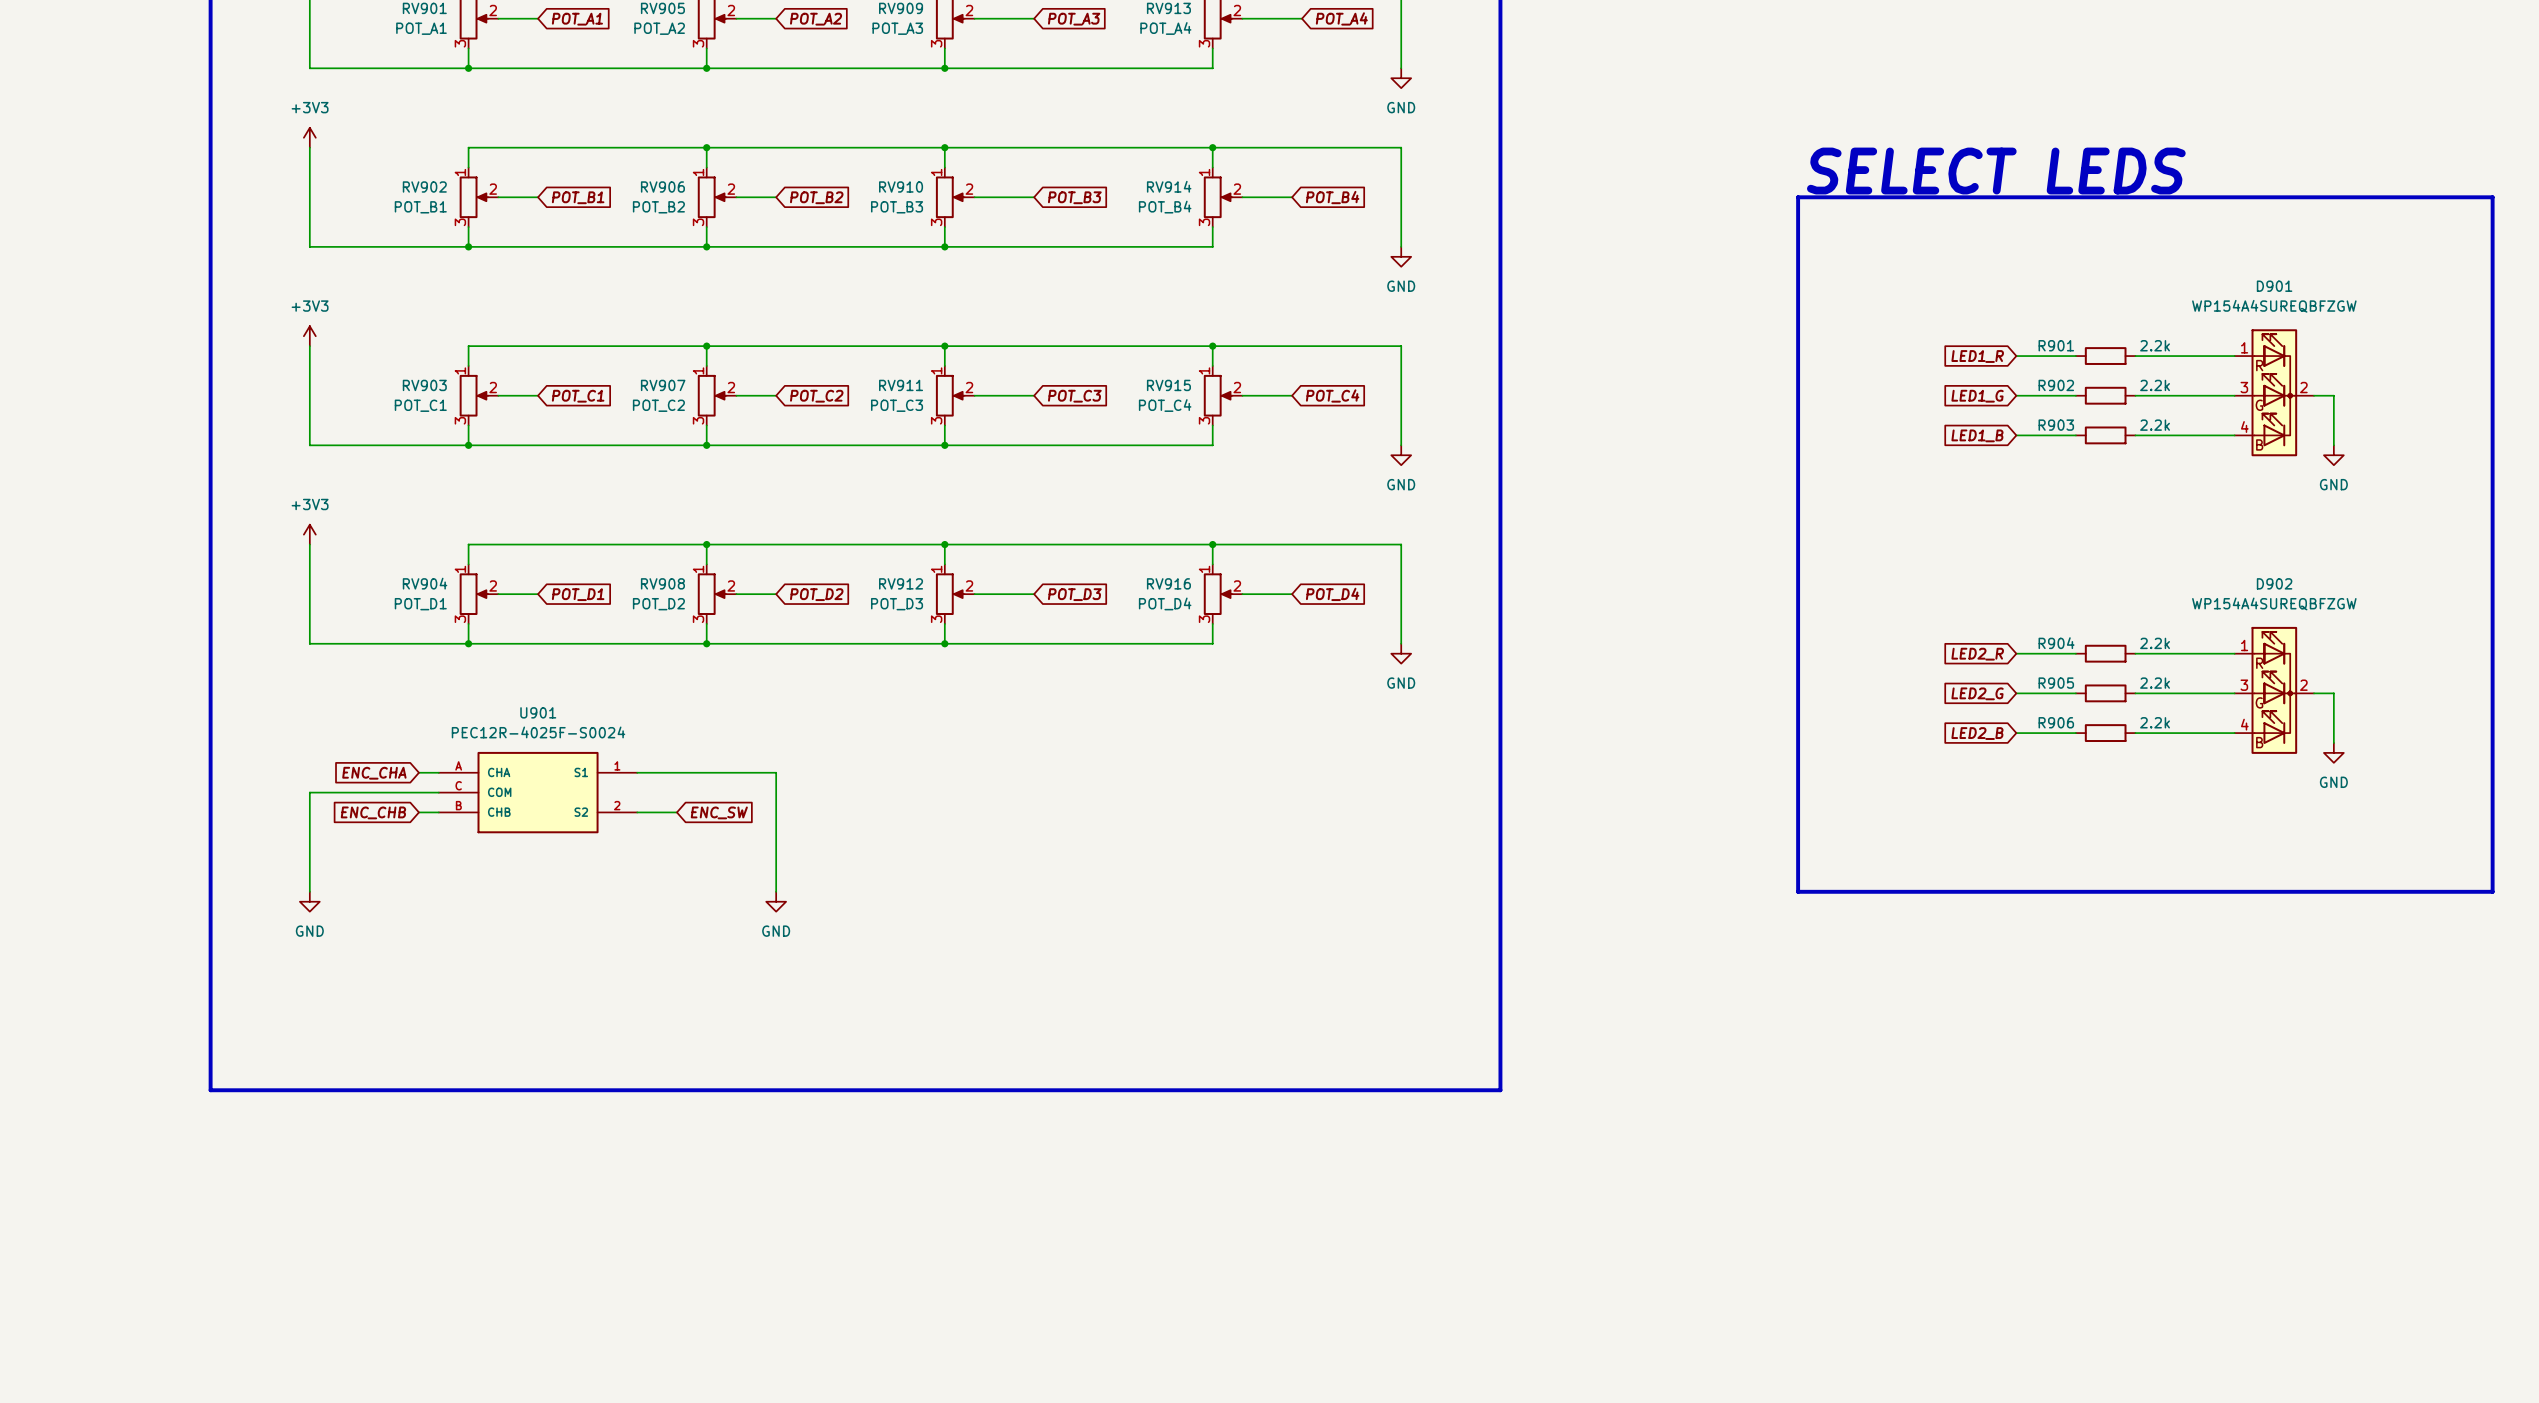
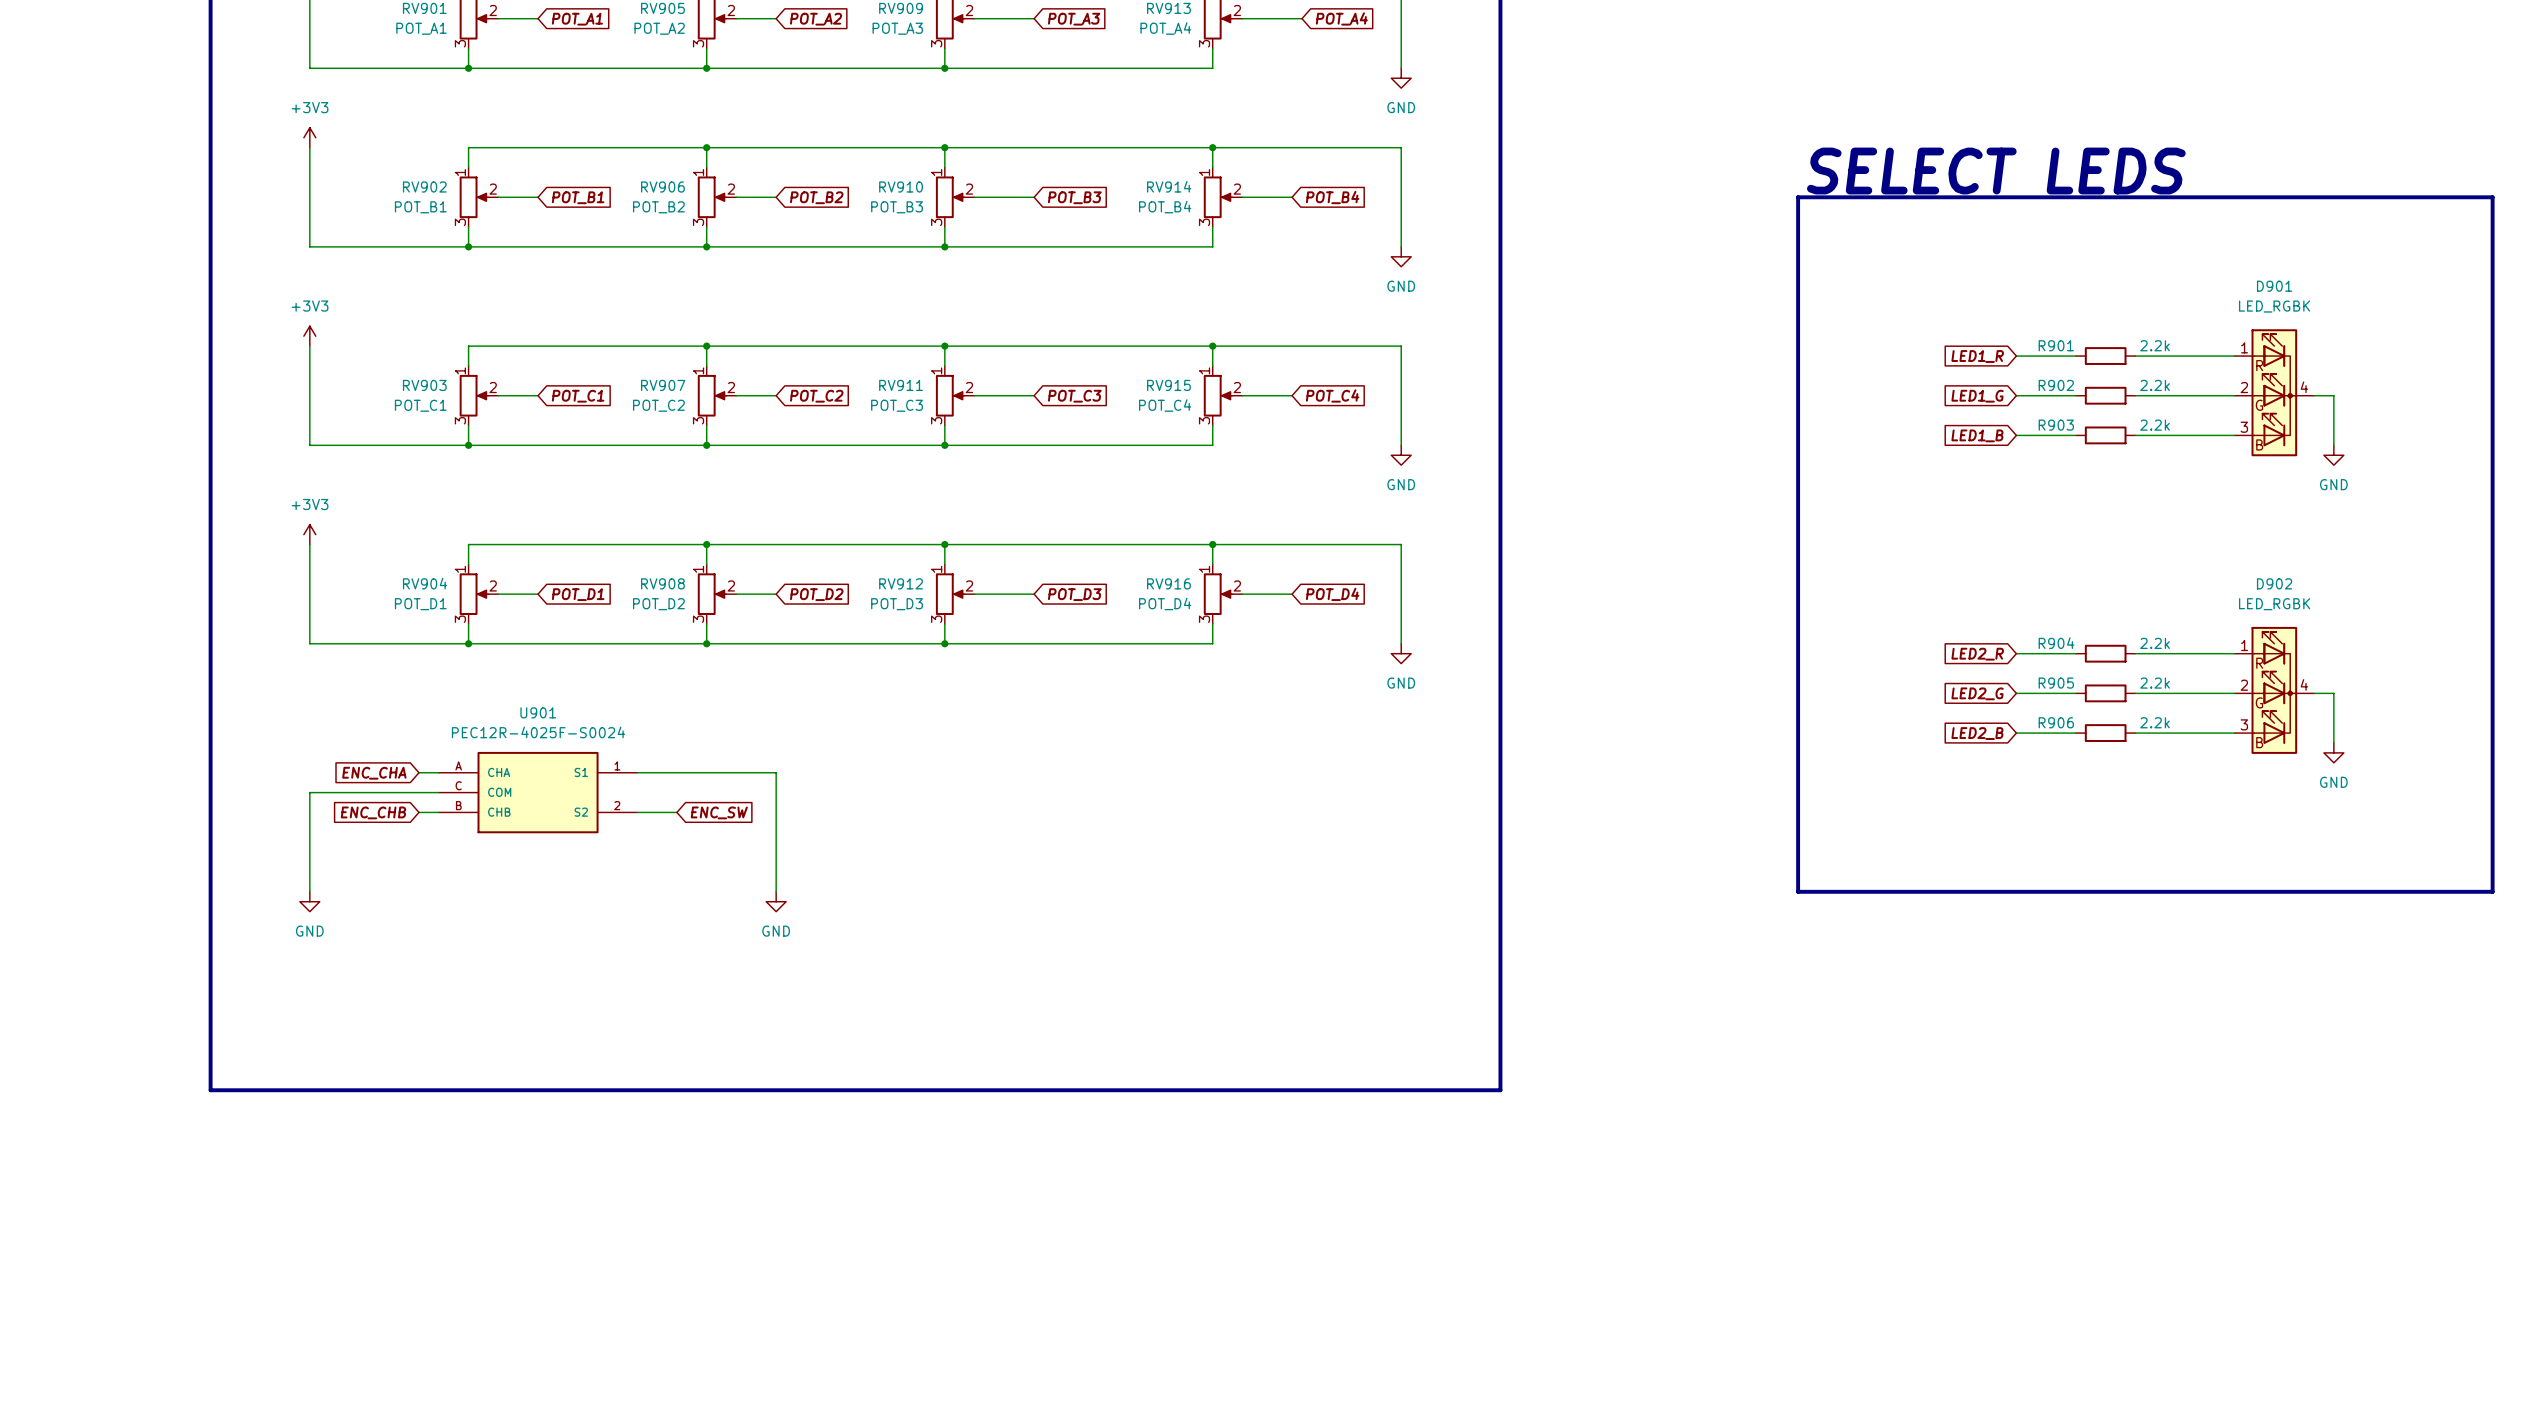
D901 value: WP154A4SUREQBFZGW (2274, 306) -> LED_RGBK (2274, 306)
D901 pin number: 3 (2244, 387) -> 2 (2244, 387)
D901 pin number: 2 (2303, 387) -> 4 (2304, 387)
D901 pin number: 4 (2244, 426) -> 3 (2244, 427)
D902 value: WP154A4SUREQBFZGW (2274, 603) -> LED_RGBK (2274, 604)
D902 pin number: 3 (2244, 685) -> 2 (2244, 685)
D902 pin number: 2 (2303, 685) -> 4 (2304, 684)
D902 pin number: 4 (2244, 724) -> 3 (2244, 724)

